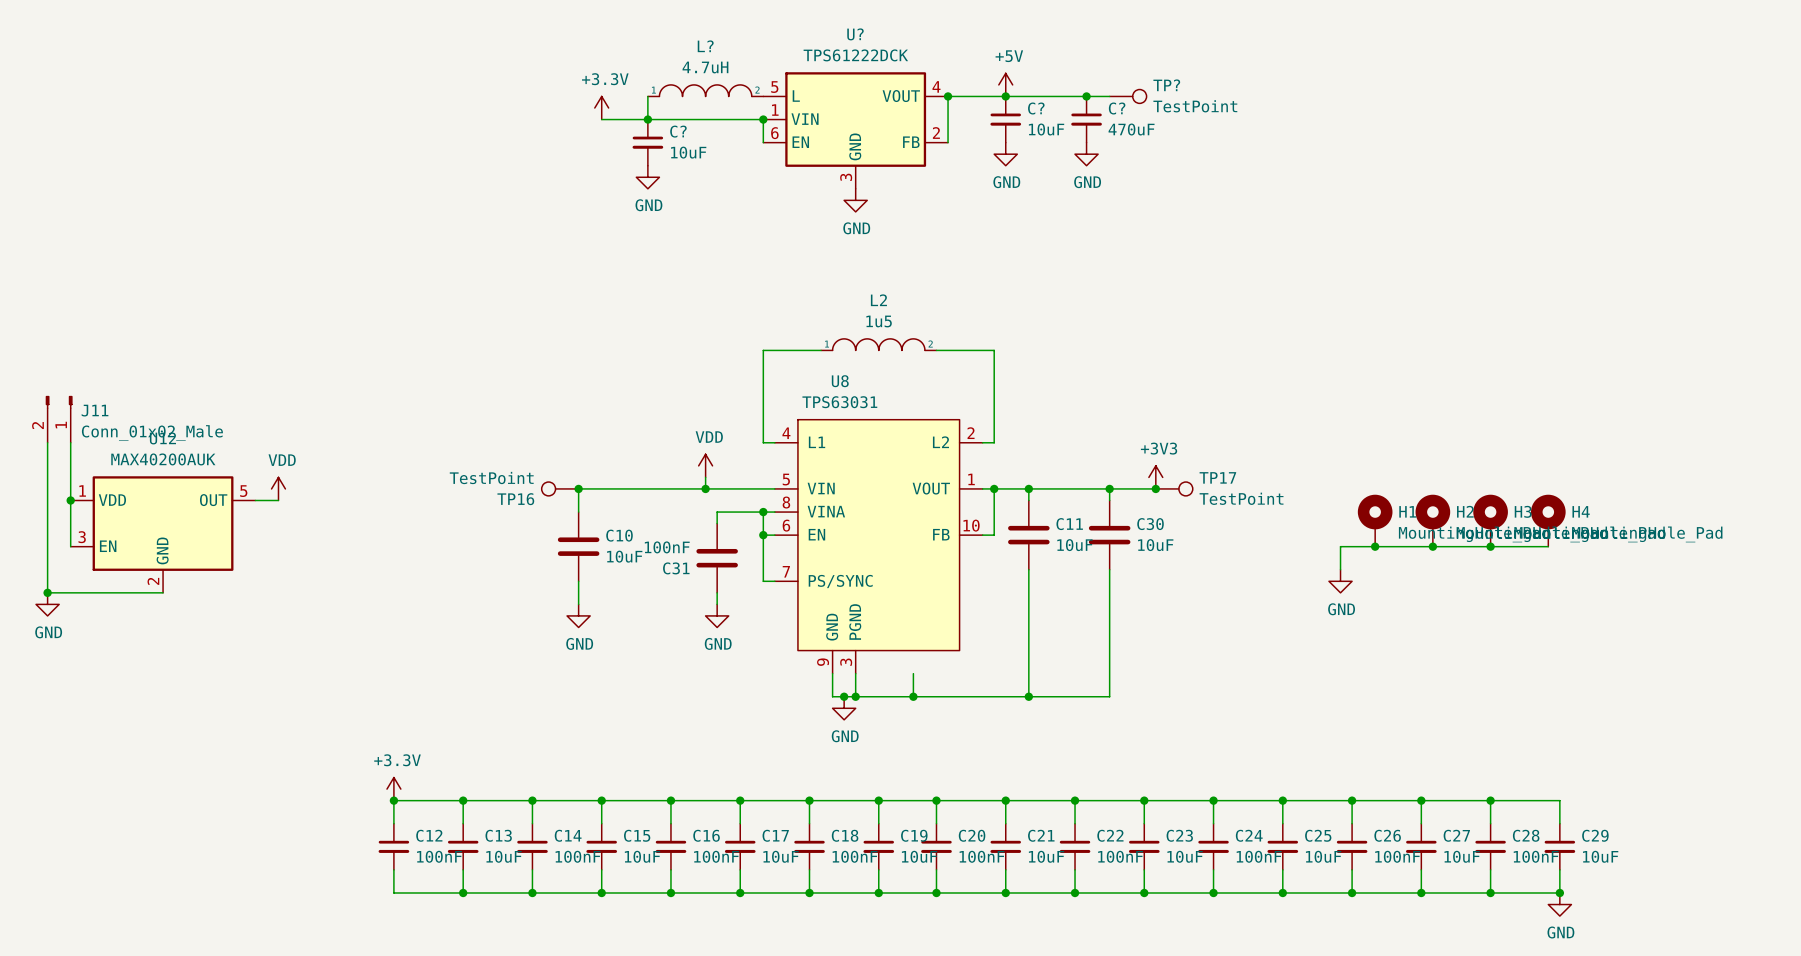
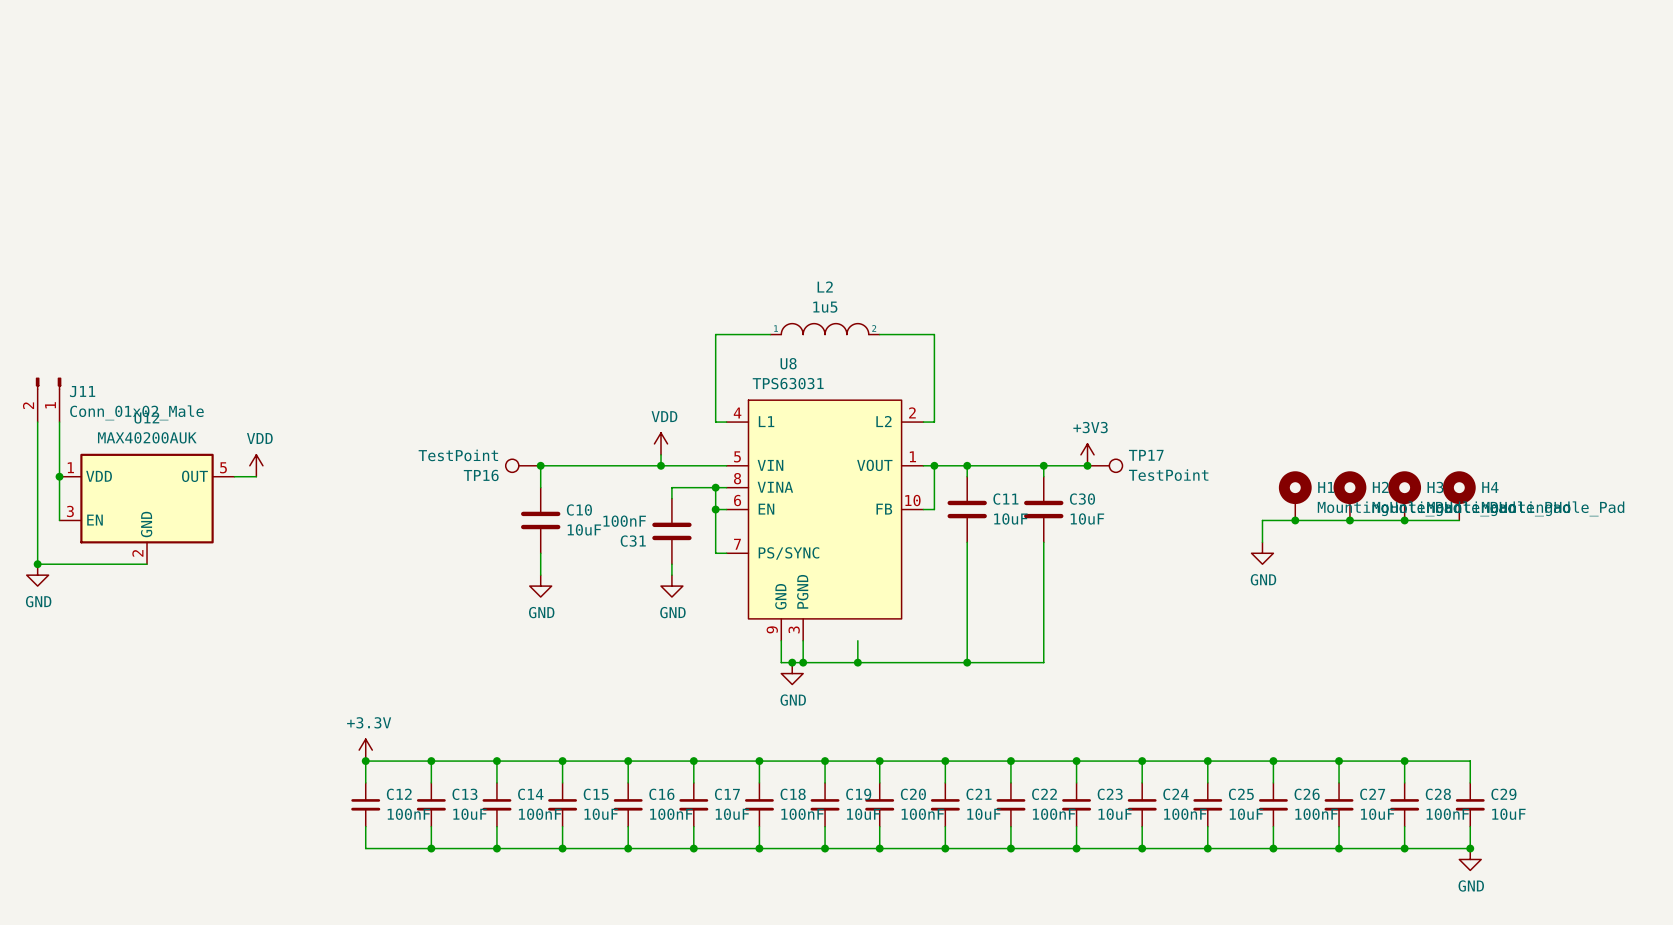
power symbol: +5V (1005, 84) -> none
L?: 4.7uH (705, 90) -> none
wire: (647, 96) (647, 119) -> none
junction: (948, 96) -> none
junction: (1005, 96) -> none
junction: (1086, 96) -> none
wire: (1109, 96) (948, 96) (948, 142) -> none
TP?: TestPoint (1128, 96) -> none
power symbol: +3.3V (601, 108) -> none
wire: (601, 119) (763, 119) (763, 142) -> none
junction: (647, 119) -> none
junction: (763, 119) -> none
C?: 10uF (1005, 119) -> none
C?: 470uF (1086, 119) -> none
U?: TPS61222DCK (855, 130) -> none
C?: 10uF (647, 142) -> none
power symbol: GND (1005, 154) -> none
power symbol: GND (1086, 154) -> none
power symbol: GND (647, 177) -> none
power symbol: GND (855, 200) -> none

